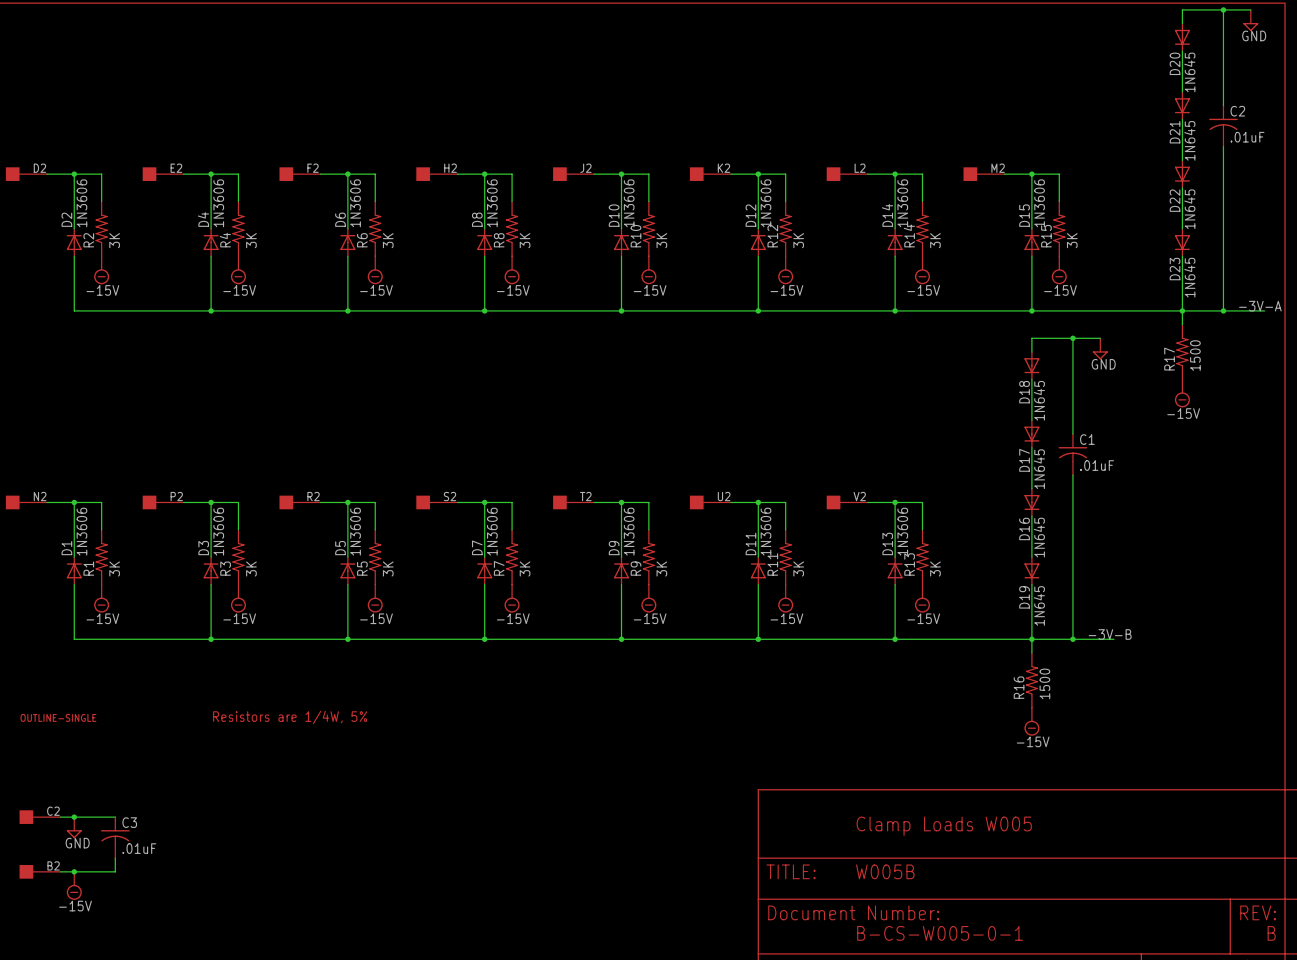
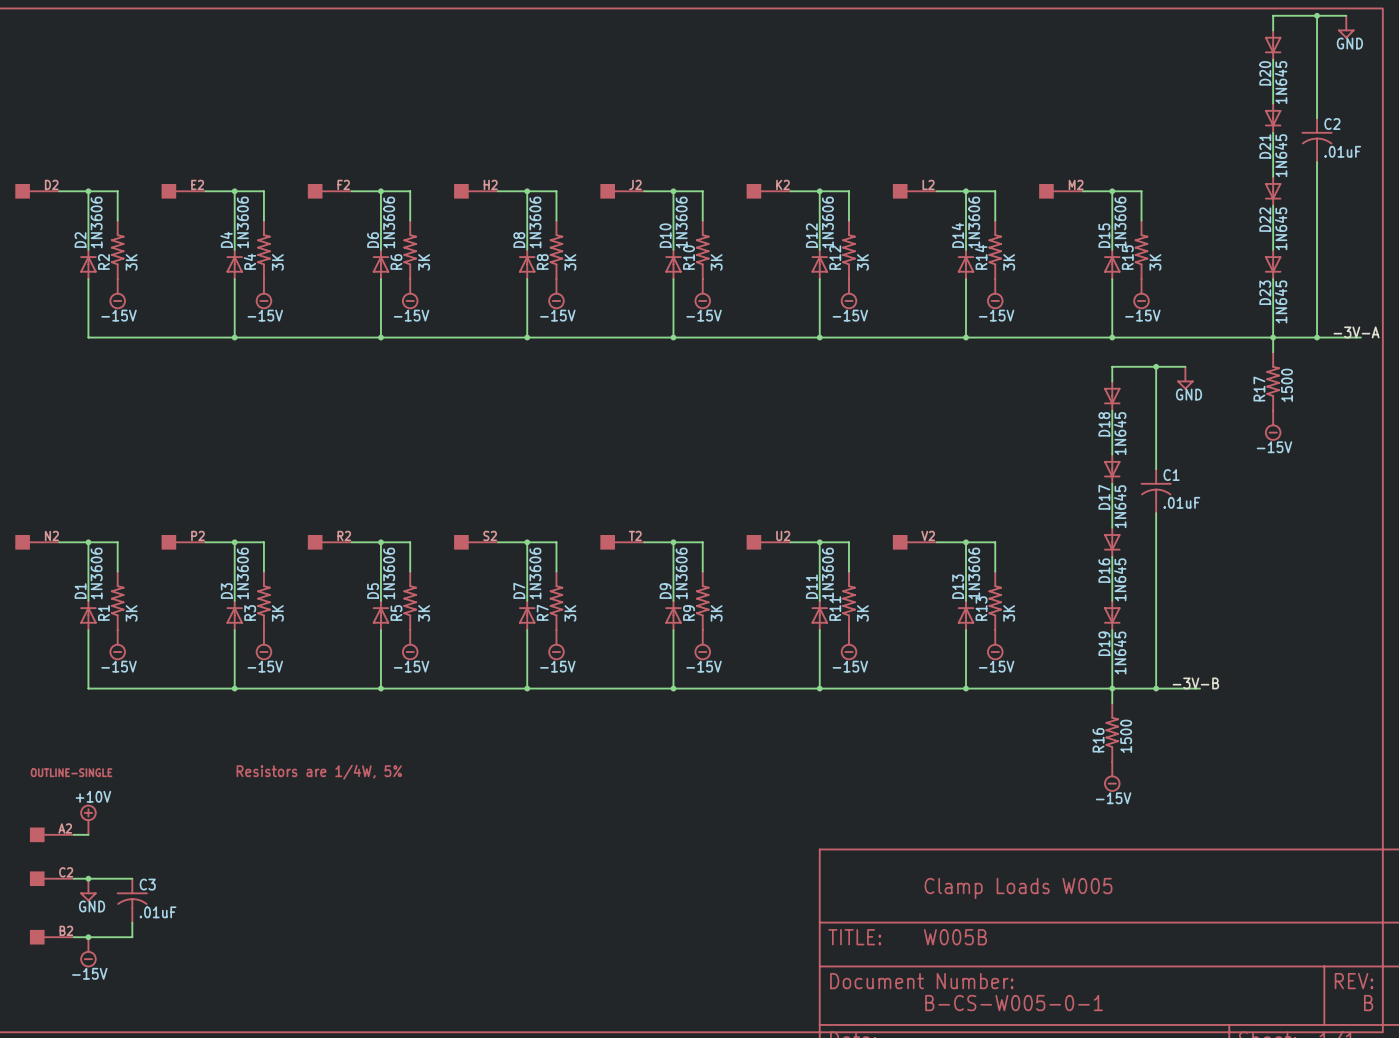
power symbol: none -> +10V (88, 819)
part: none -> (51, 834)
wire: none -> (73, 834) (88, 834)

